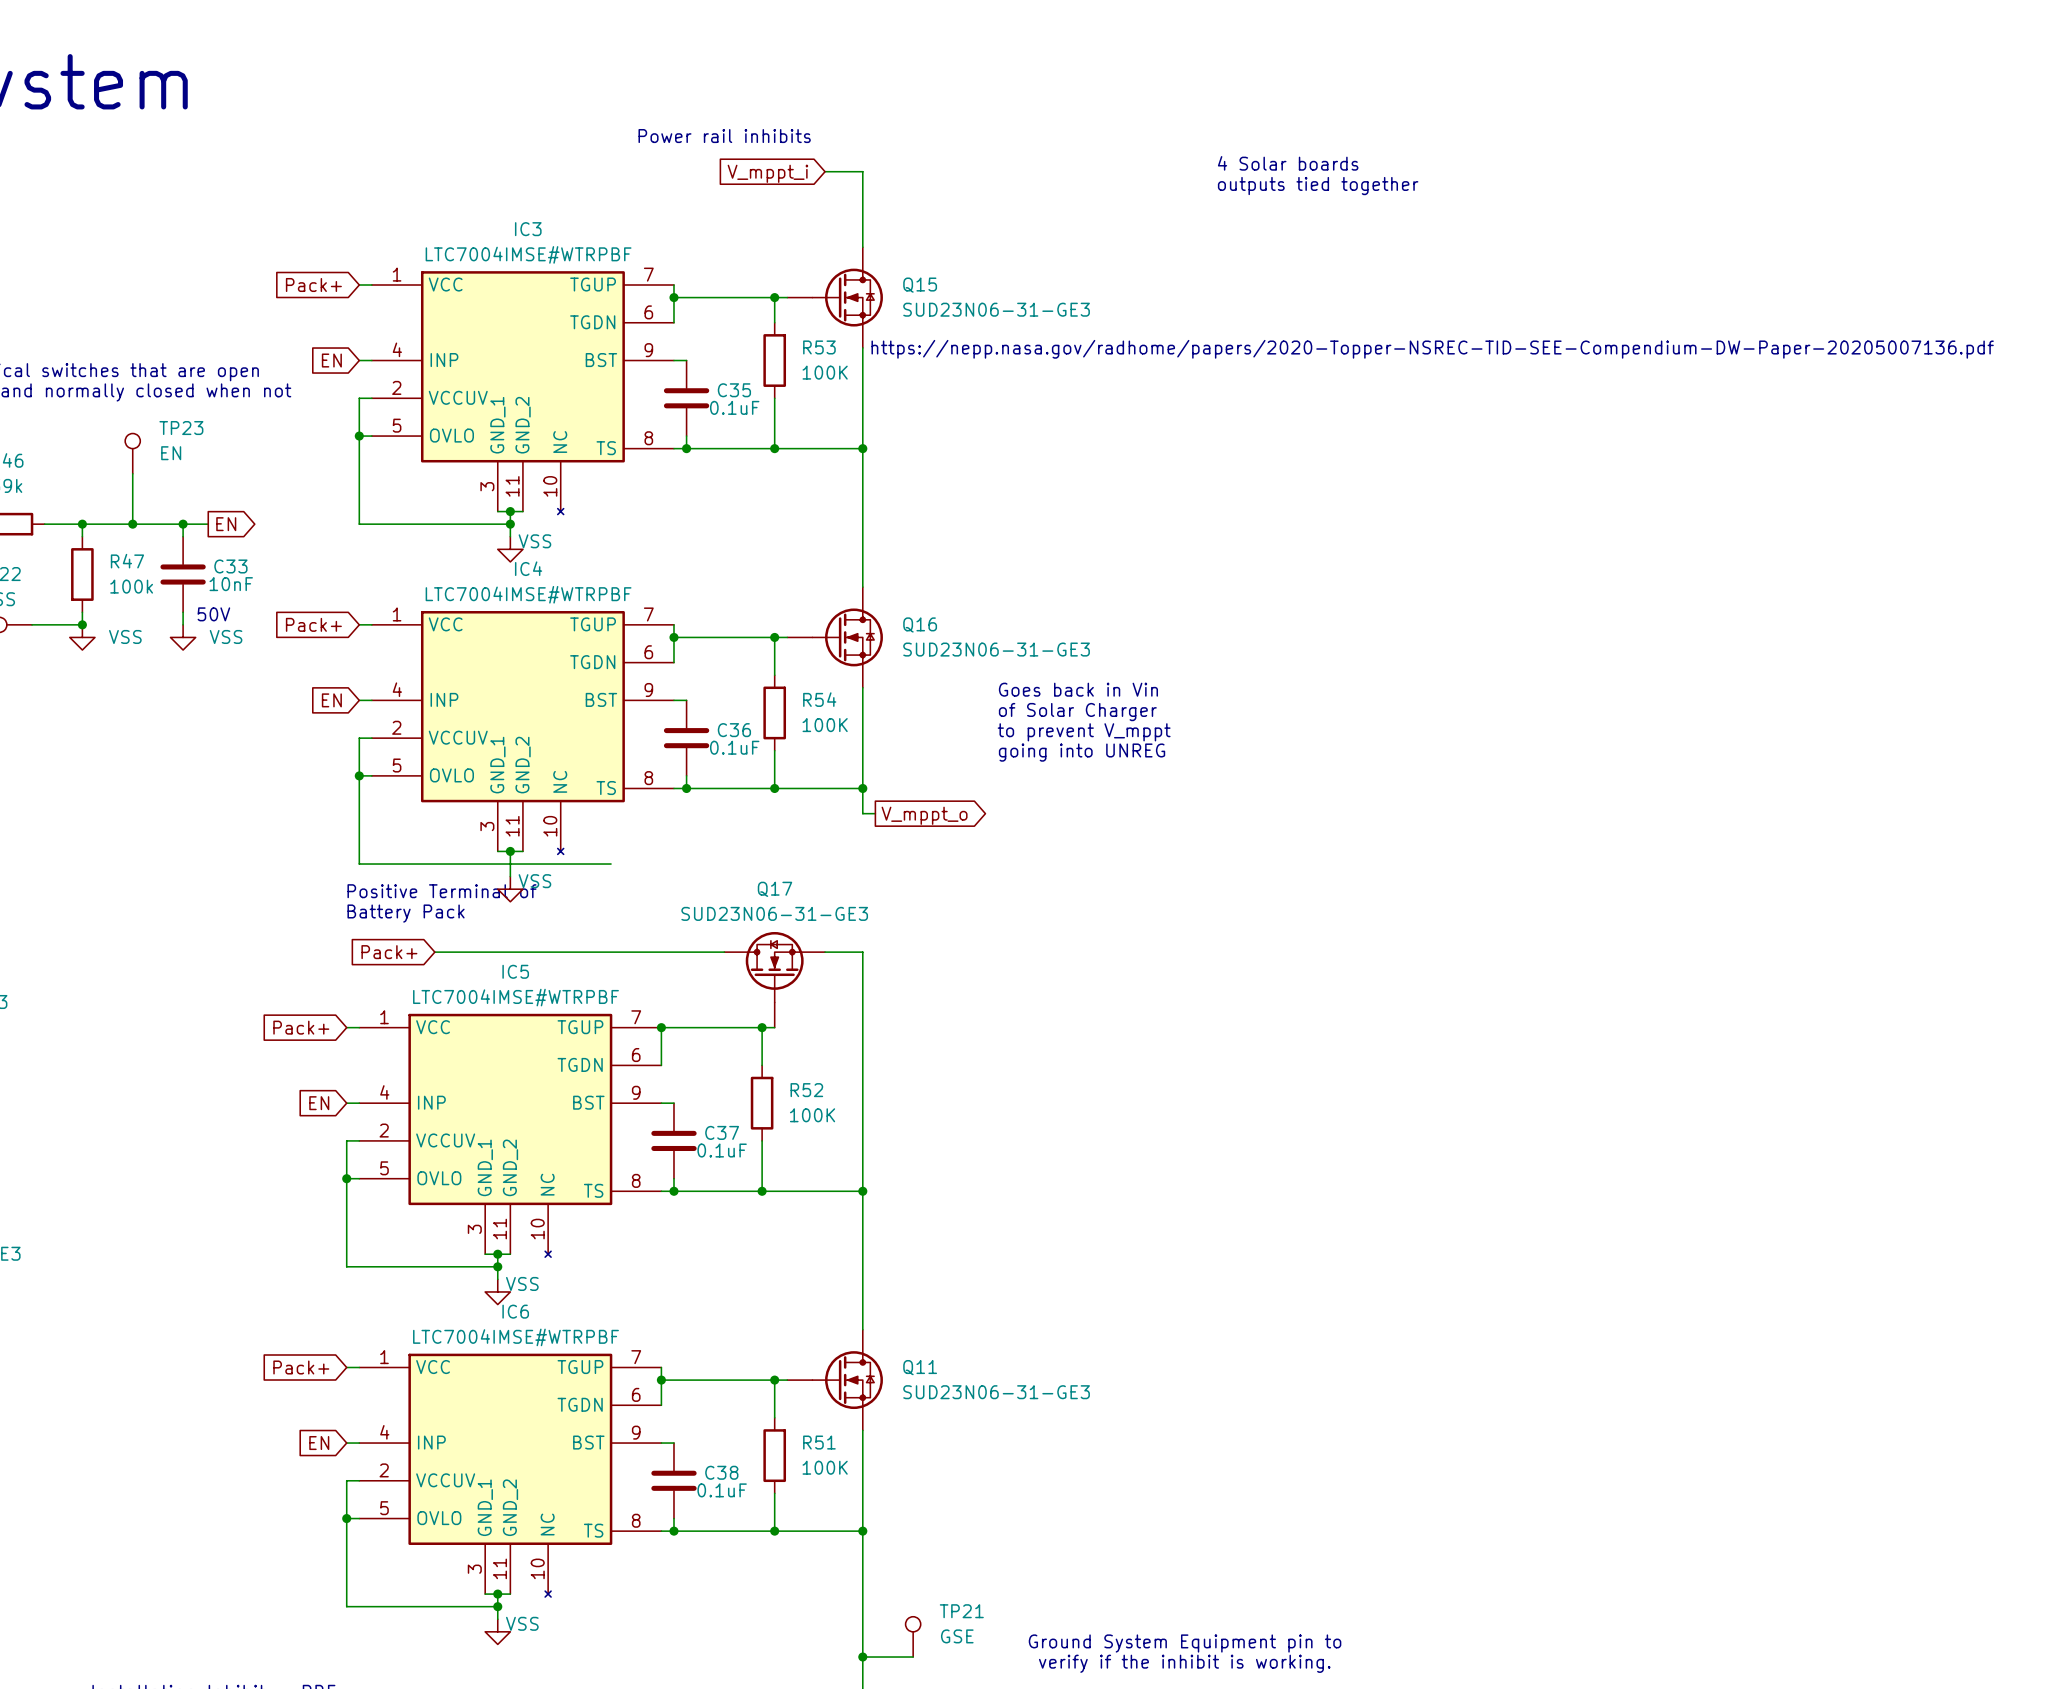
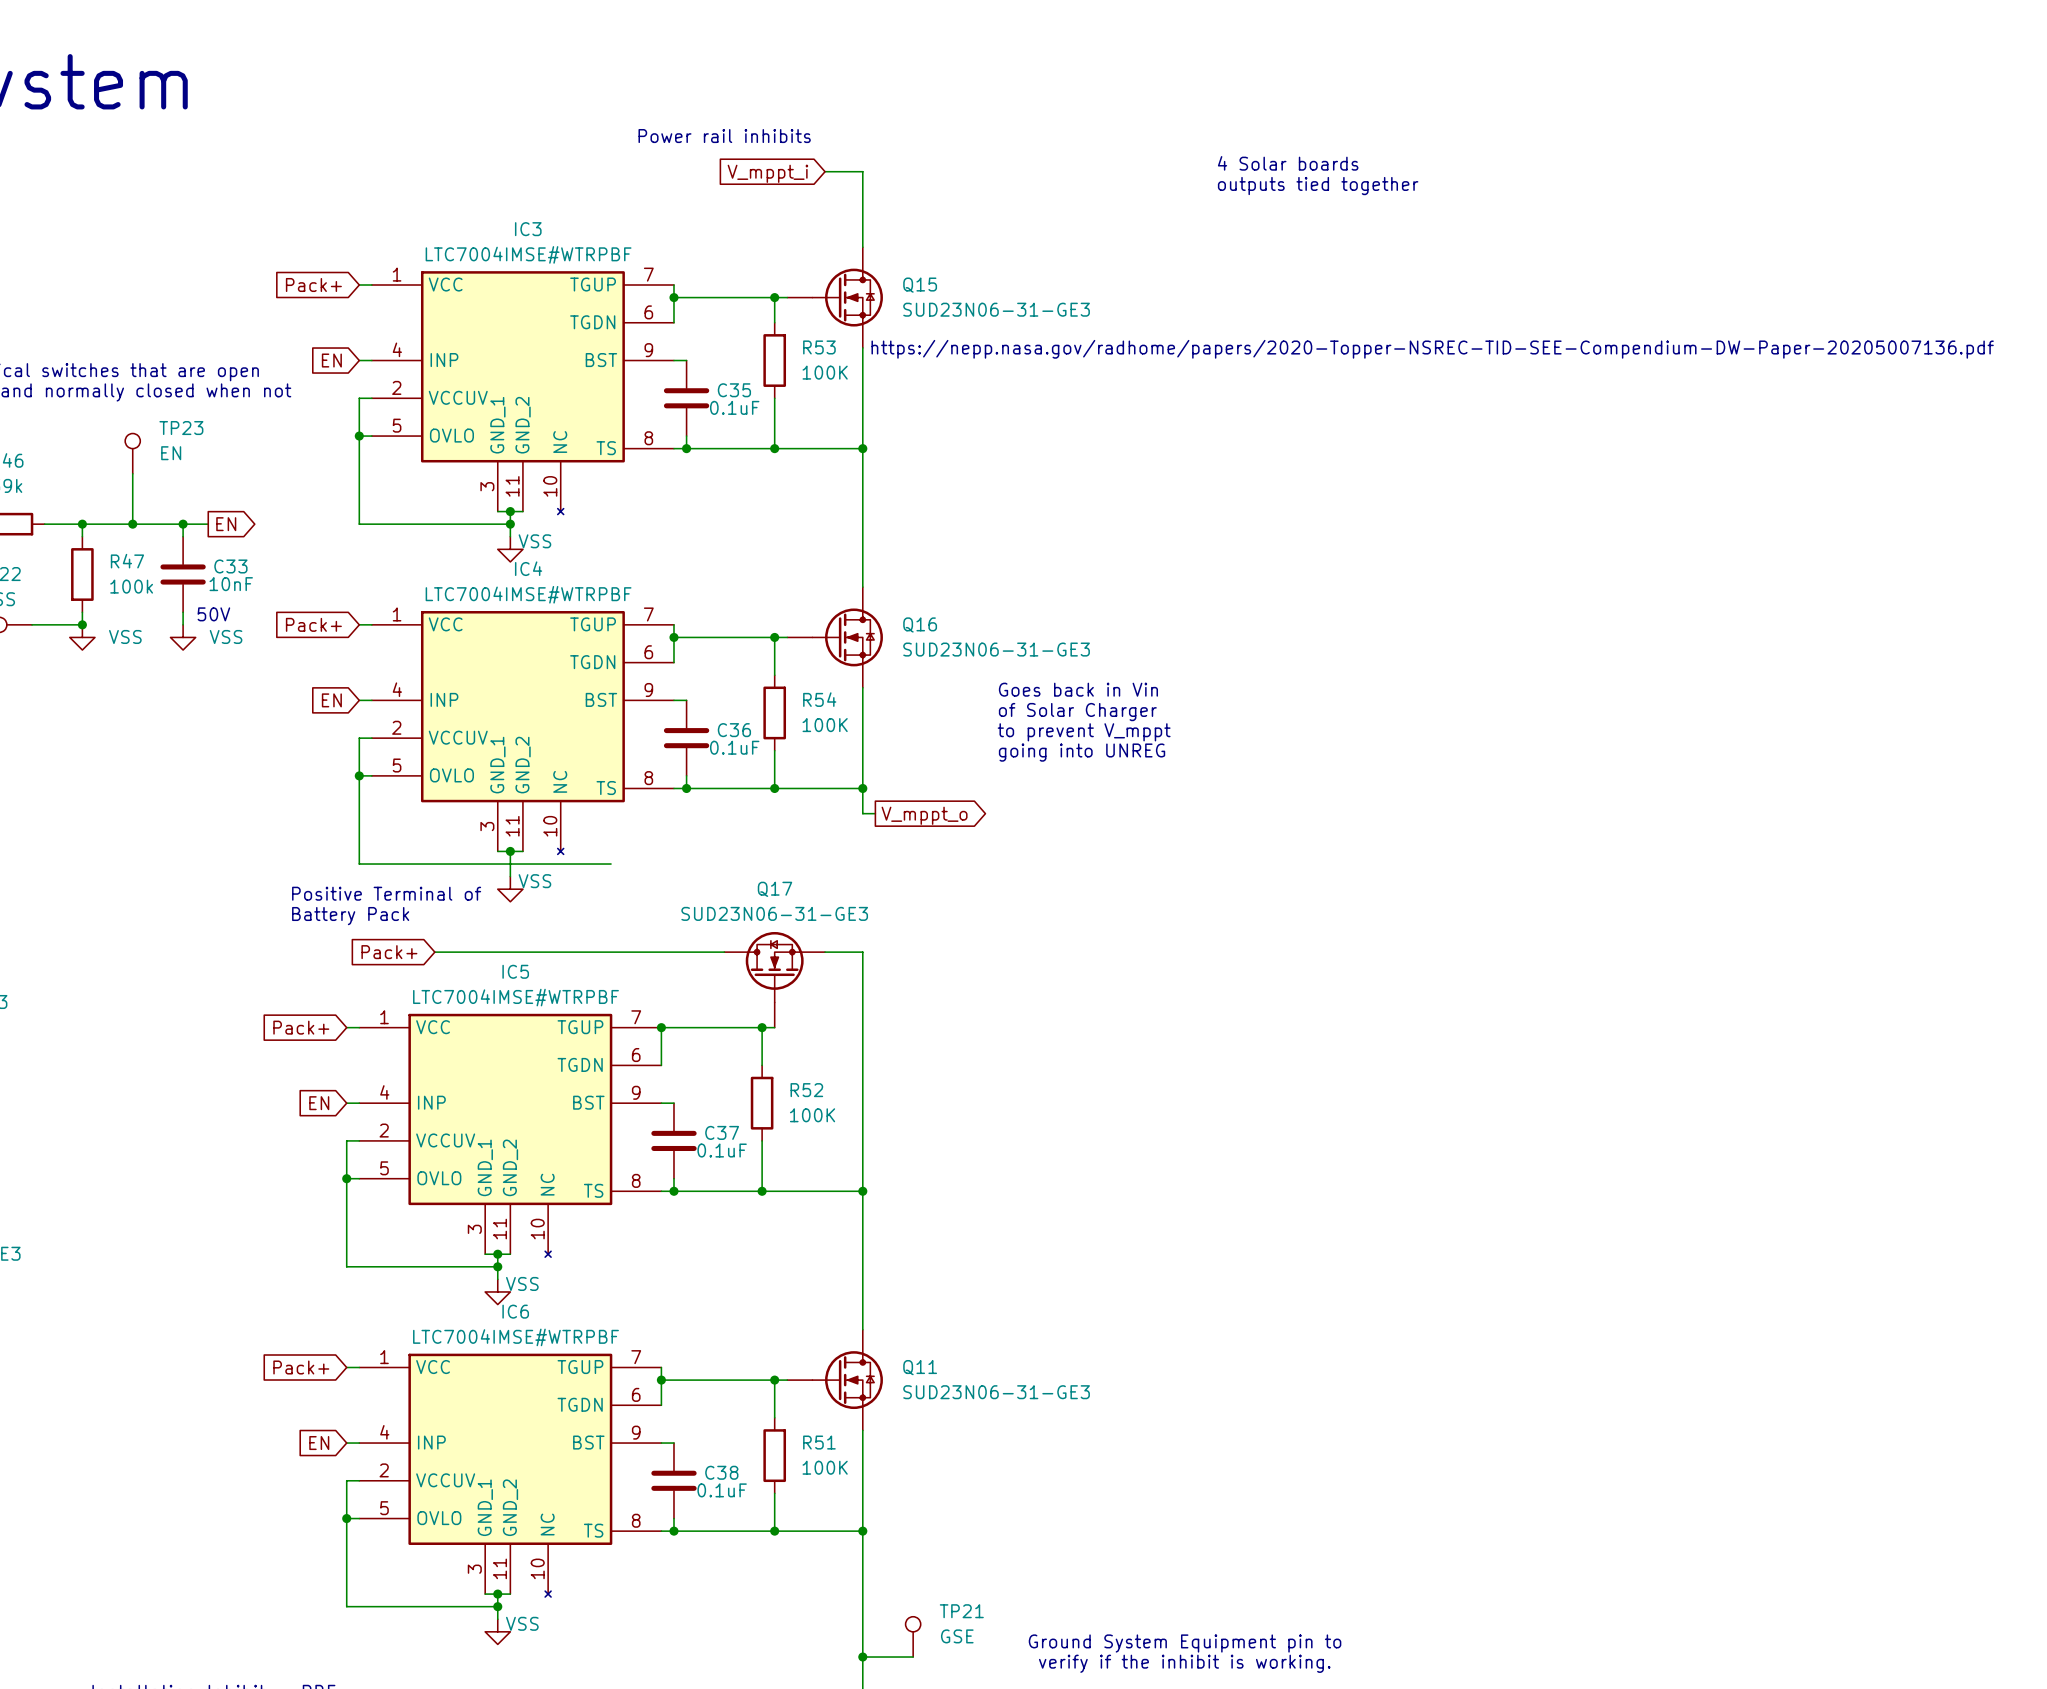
text position: Positive Terminal of (442, 891) -> Positive Terminal of (386, 893)
text position: Battery Pack (406, 913) -> Battery Pack (350, 916)

